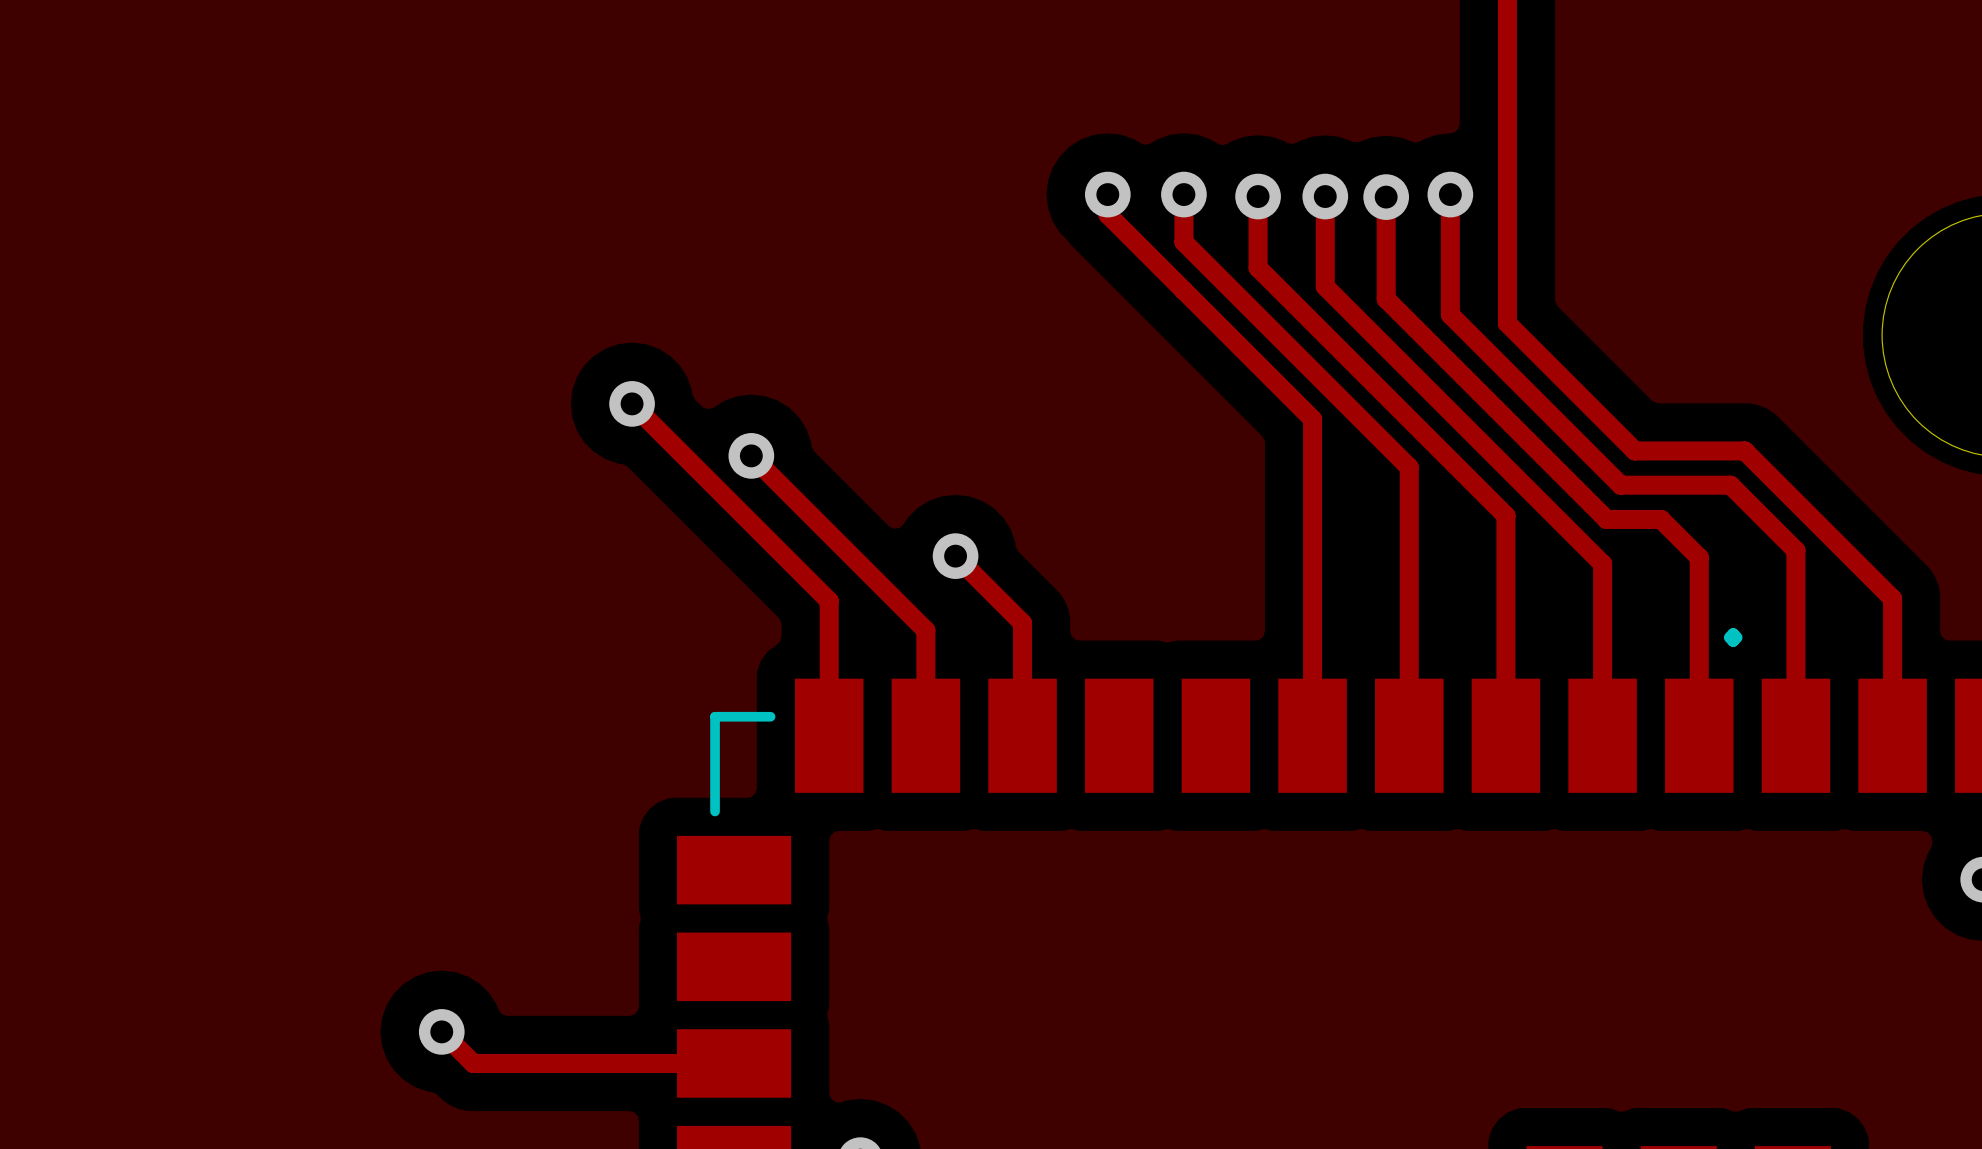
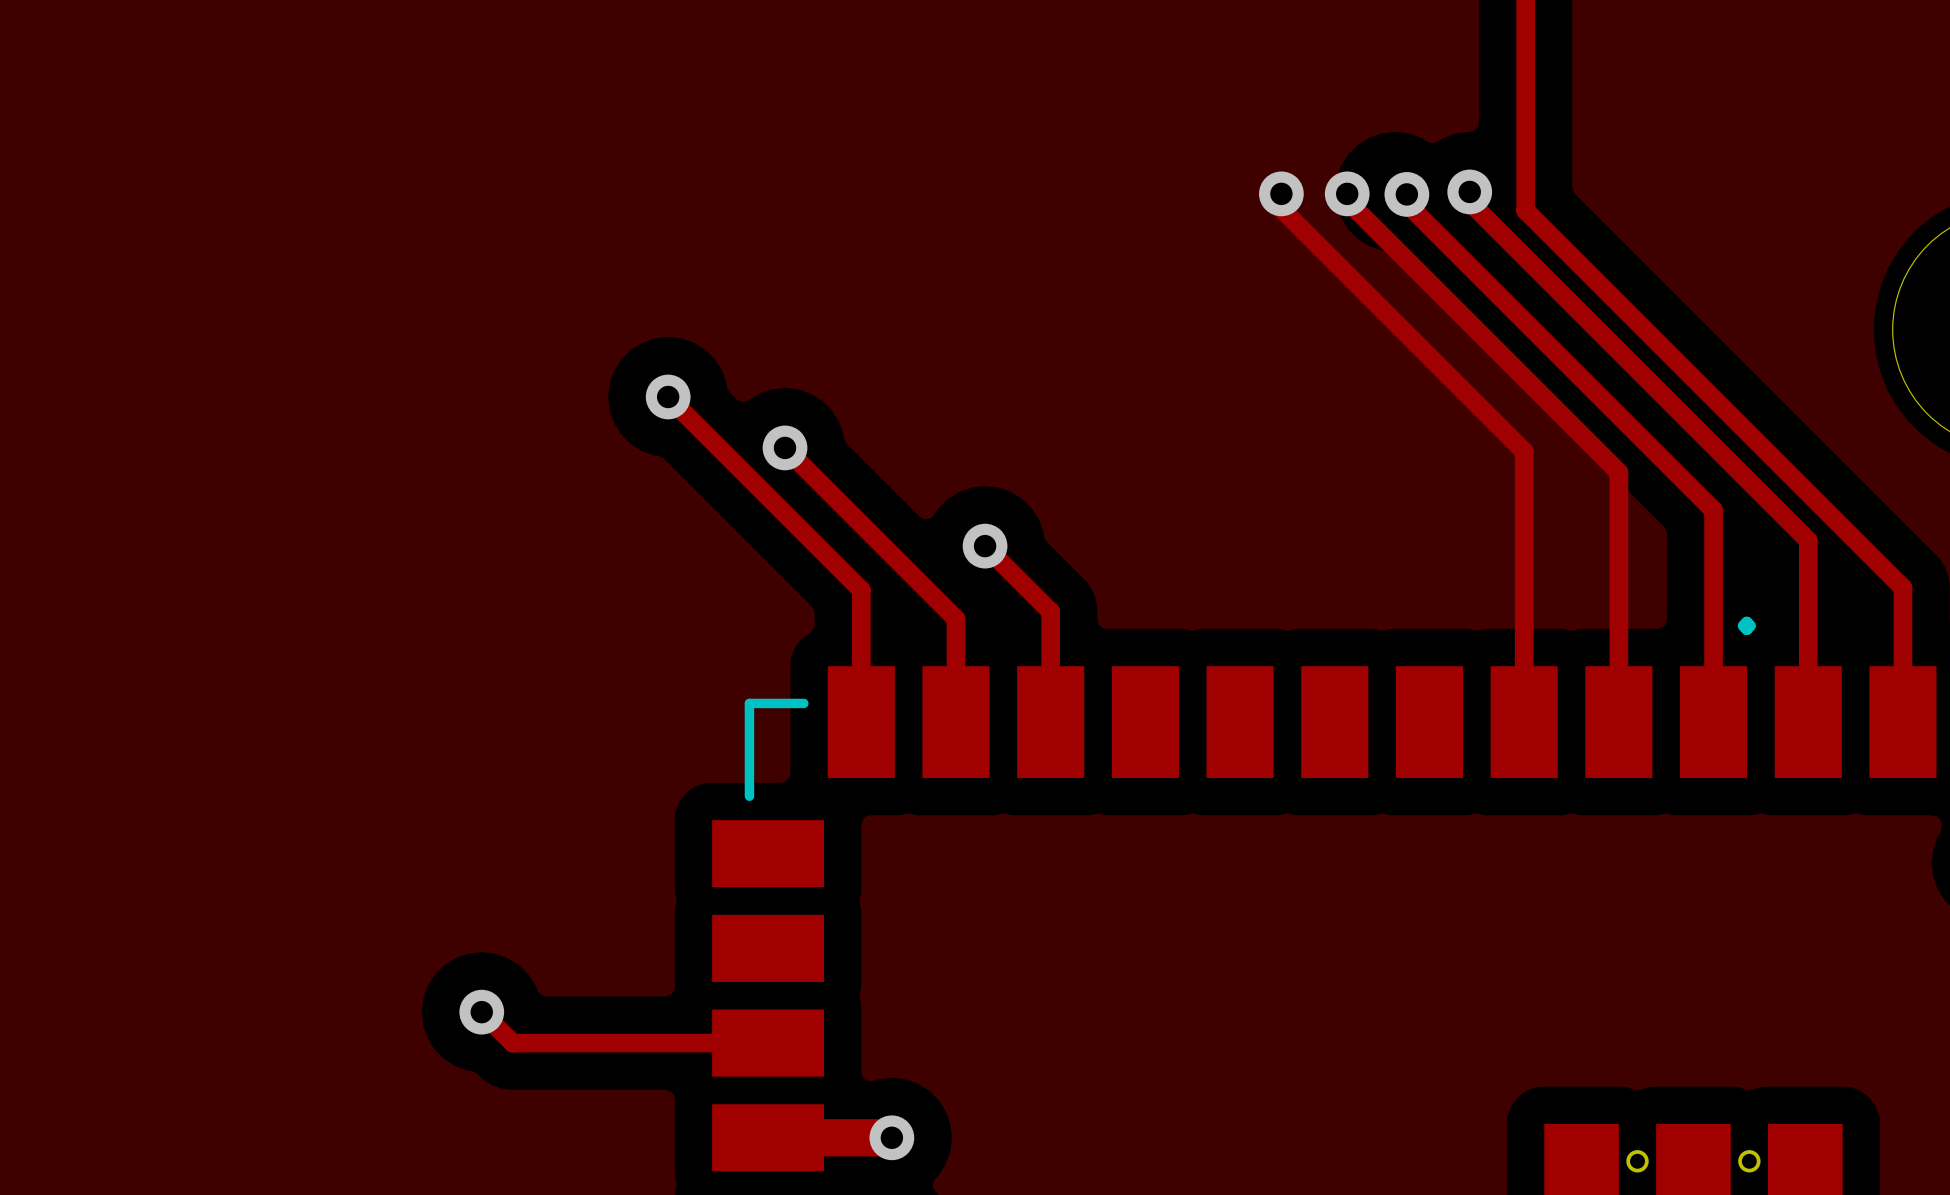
track: (1107, 194) (1107, 214) (1312, 419) (1312, 735) -> none
via: (1107, 194) -> none
track: (1183, 194) (1183, 242) (1409, 467) (1409, 735) -> none
via: (1183, 194) -> none
track: (1325, 203) (1325, 286) (1602, 563) -> (1347, 200) (1618, 472) (1618, 553)
track: (1450, 204) (1450, 314) (1620, 485) (1730, 485) -> (1469, 202) (1744, 476)
track: (1386, 206) (1386, 299) (1606, 519) (1661, 519) (1699, 557) -> (1406, 203) (1713, 510) (1713, 547)
track: (1258, 211) (1258, 267) (1505, 515) -> (1281, 208) (1524, 451) (1524, 506)
track: (1507, 213) (1507, 323) (1634, 450) (1744, 450) -> (1525, 210) (1758, 443)

